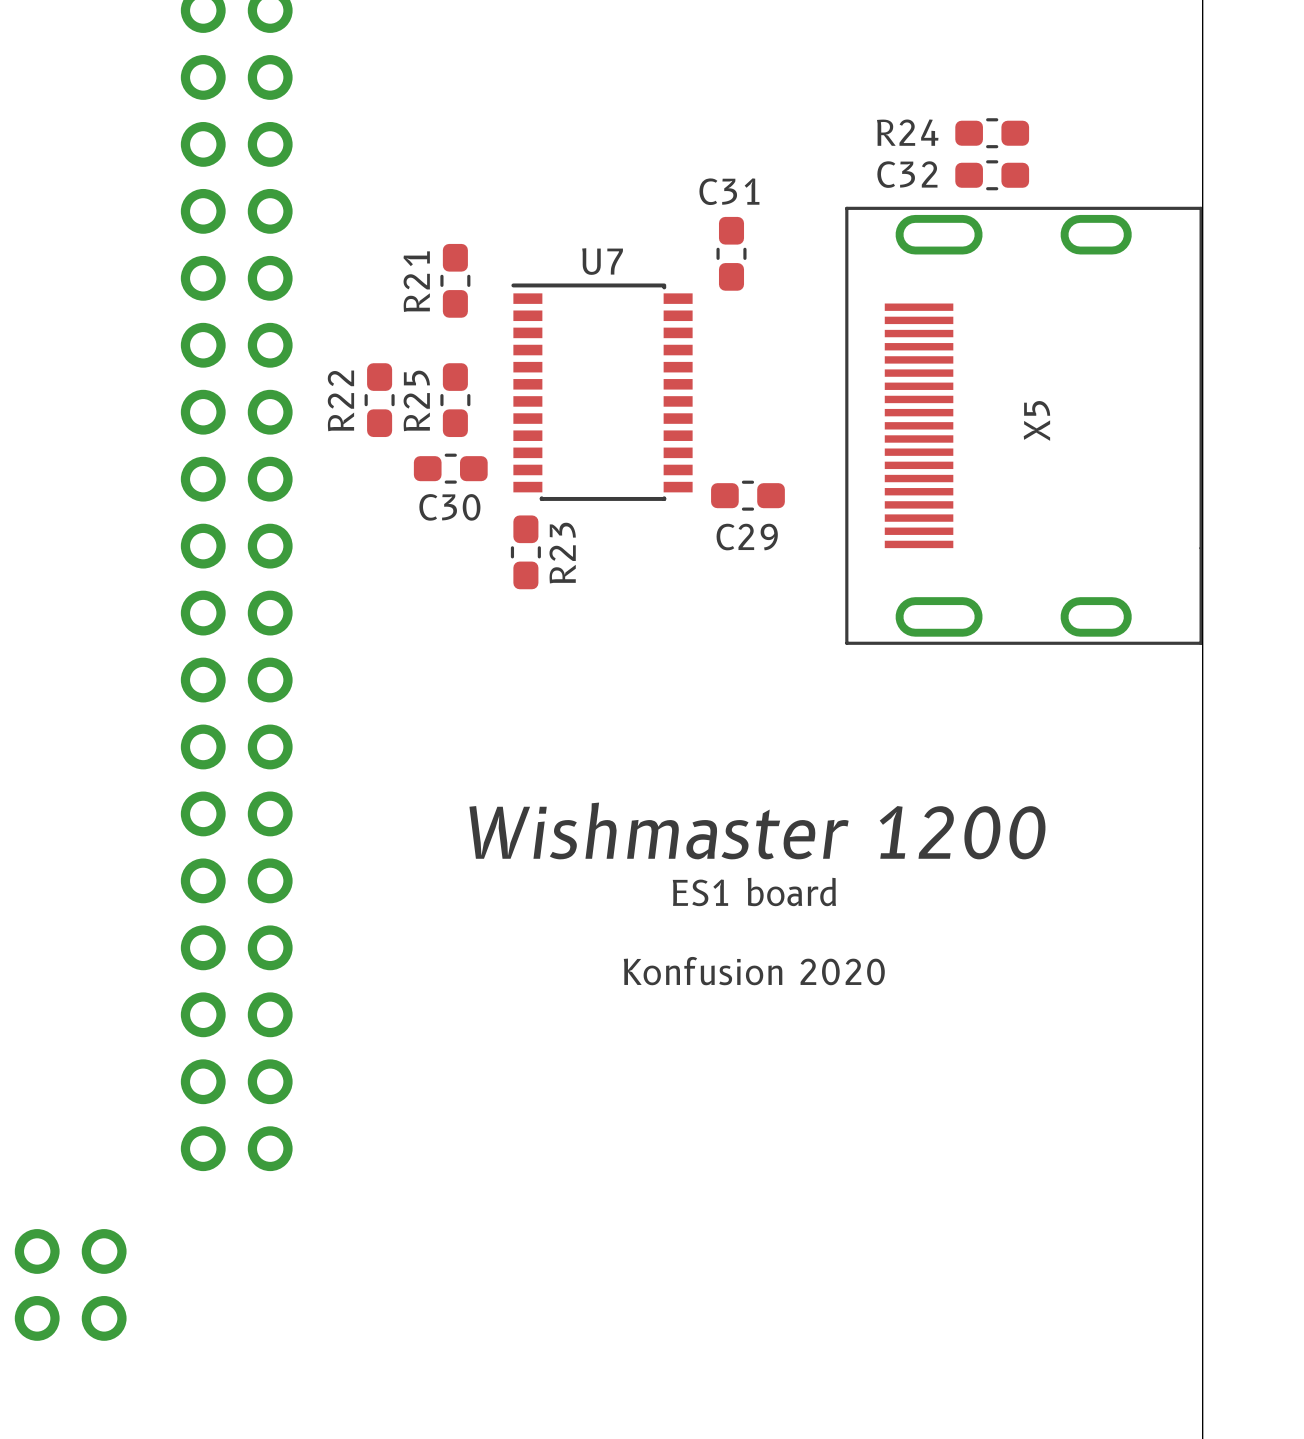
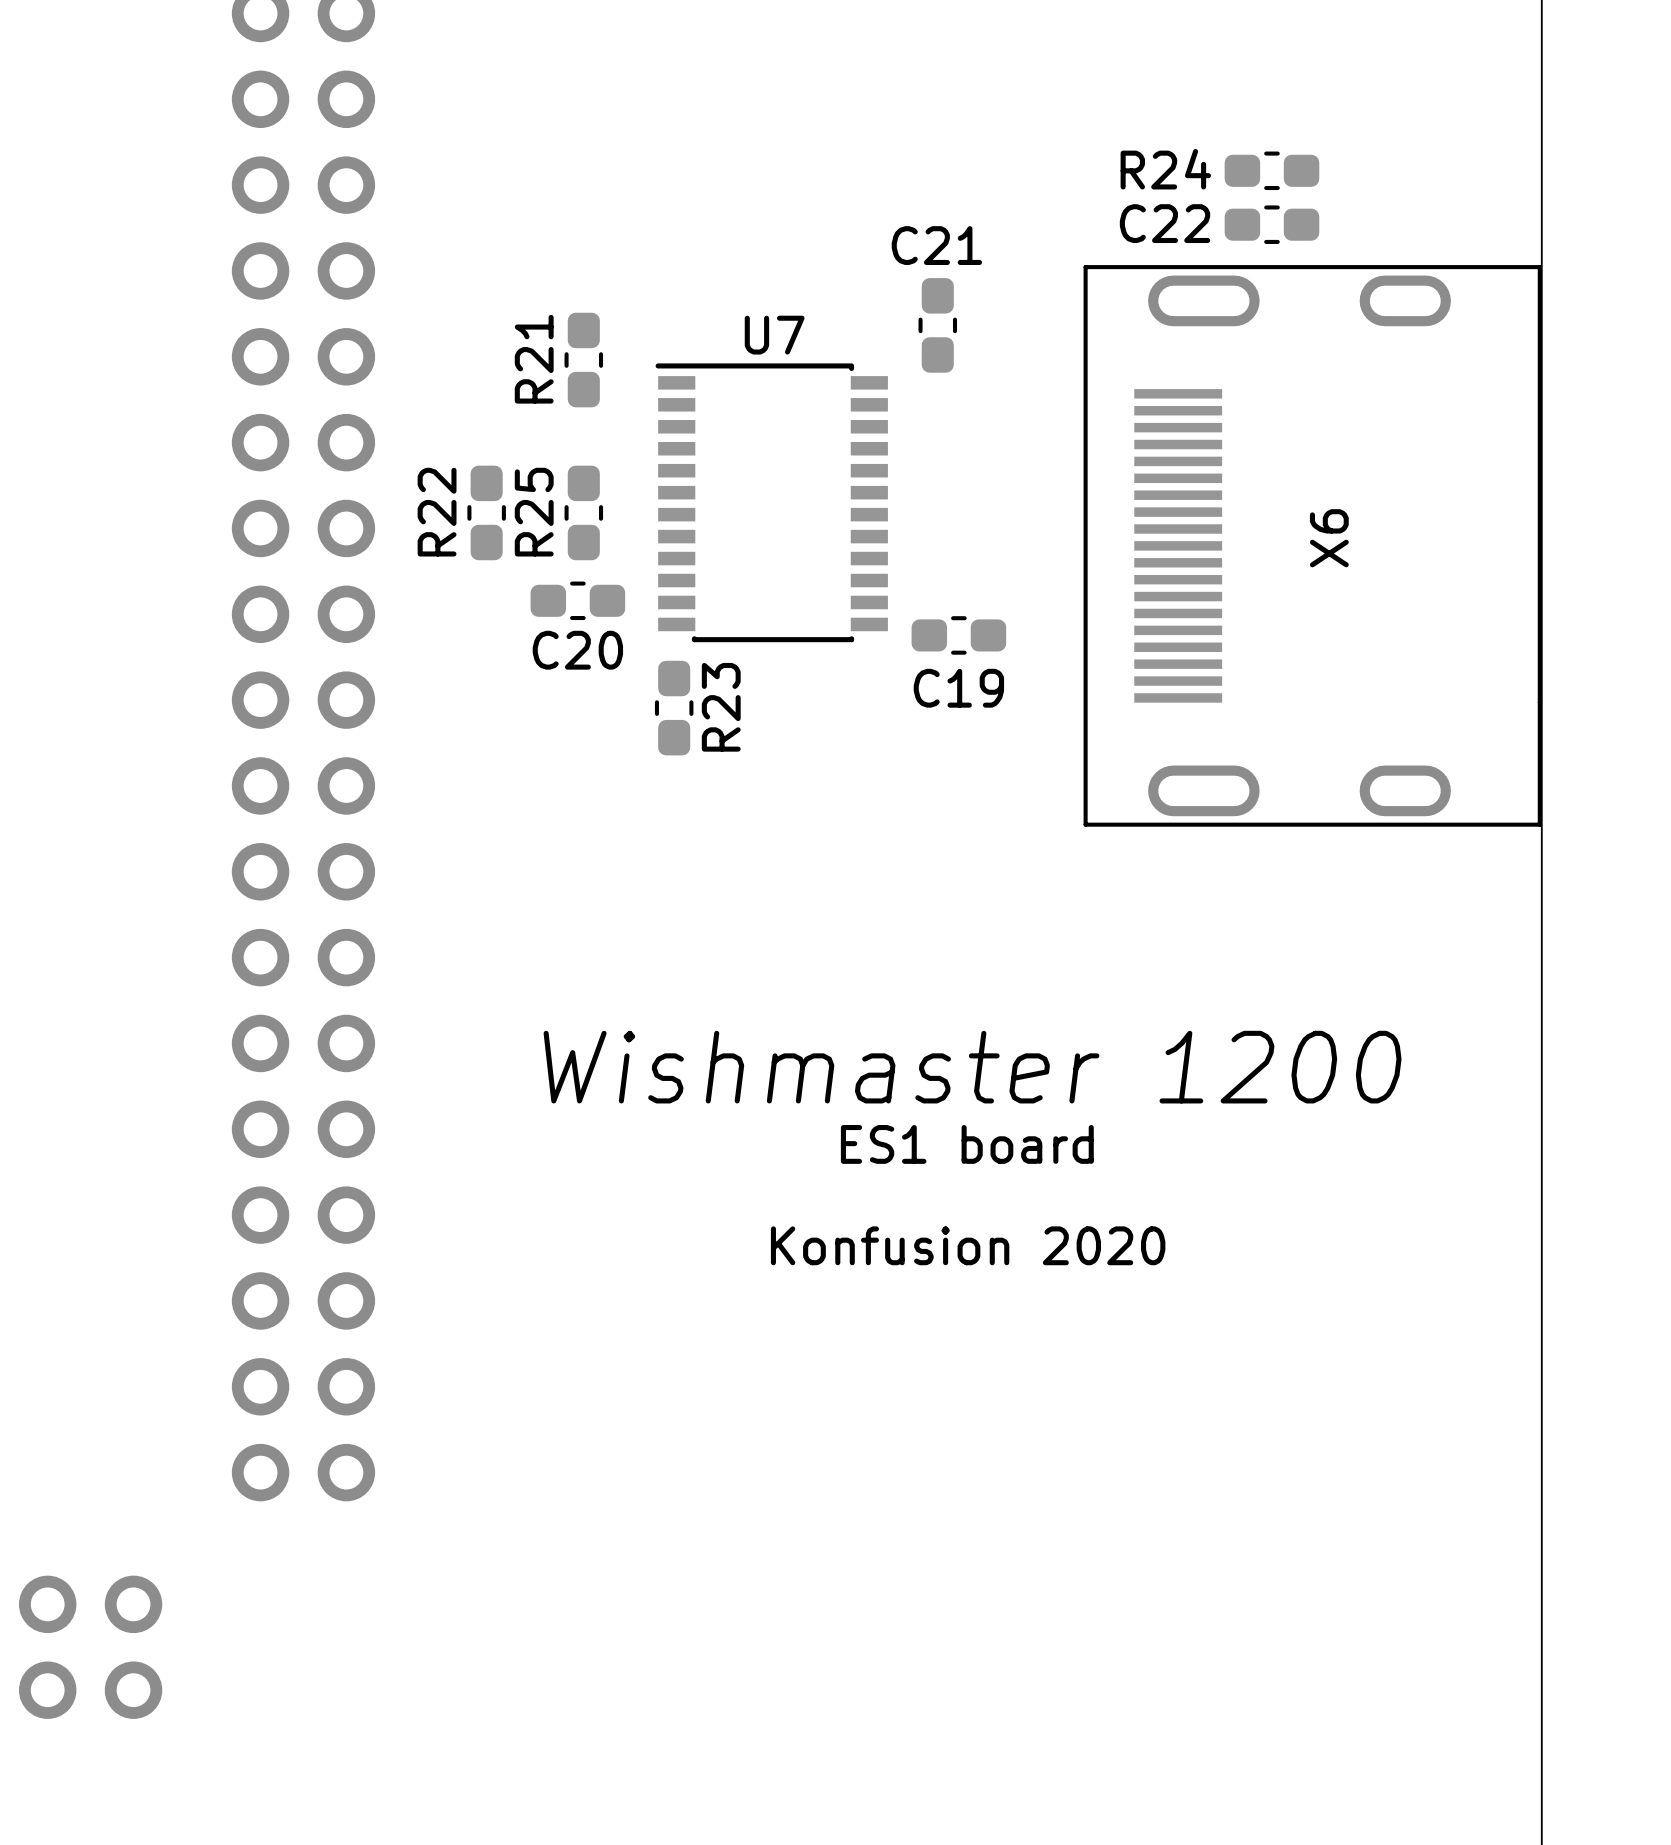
C32 name: C32 (907, 174) -> C22 (1165, 223)
C31 name: C31 (729, 191) -> C21 (936, 245)
X5 name: X5 (1036, 420) -> X6 (1329, 538)
C30 name: C30 (449, 507) -> C20 (577, 650)
C29 name: C29 (747, 537) -> C19 (958, 688)

